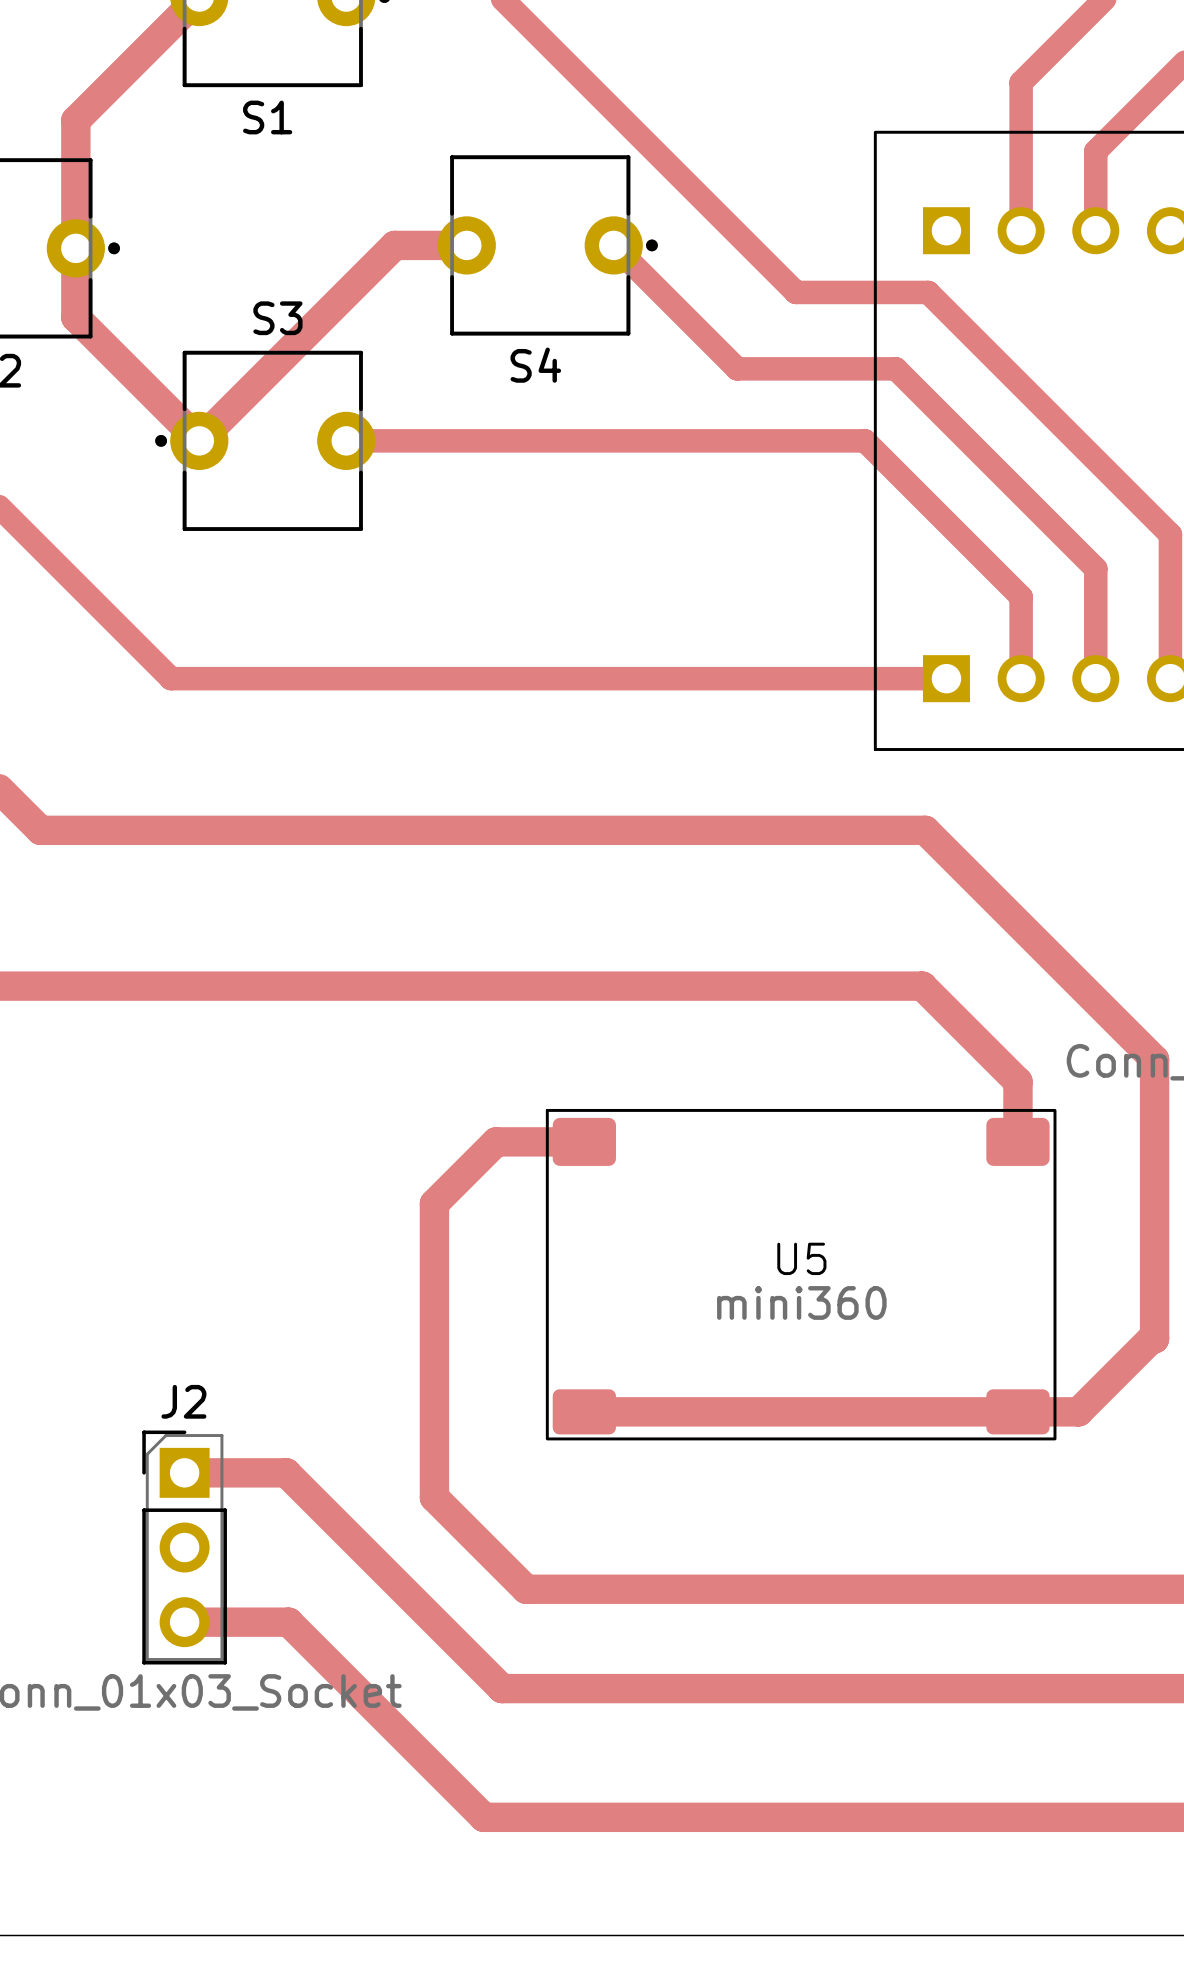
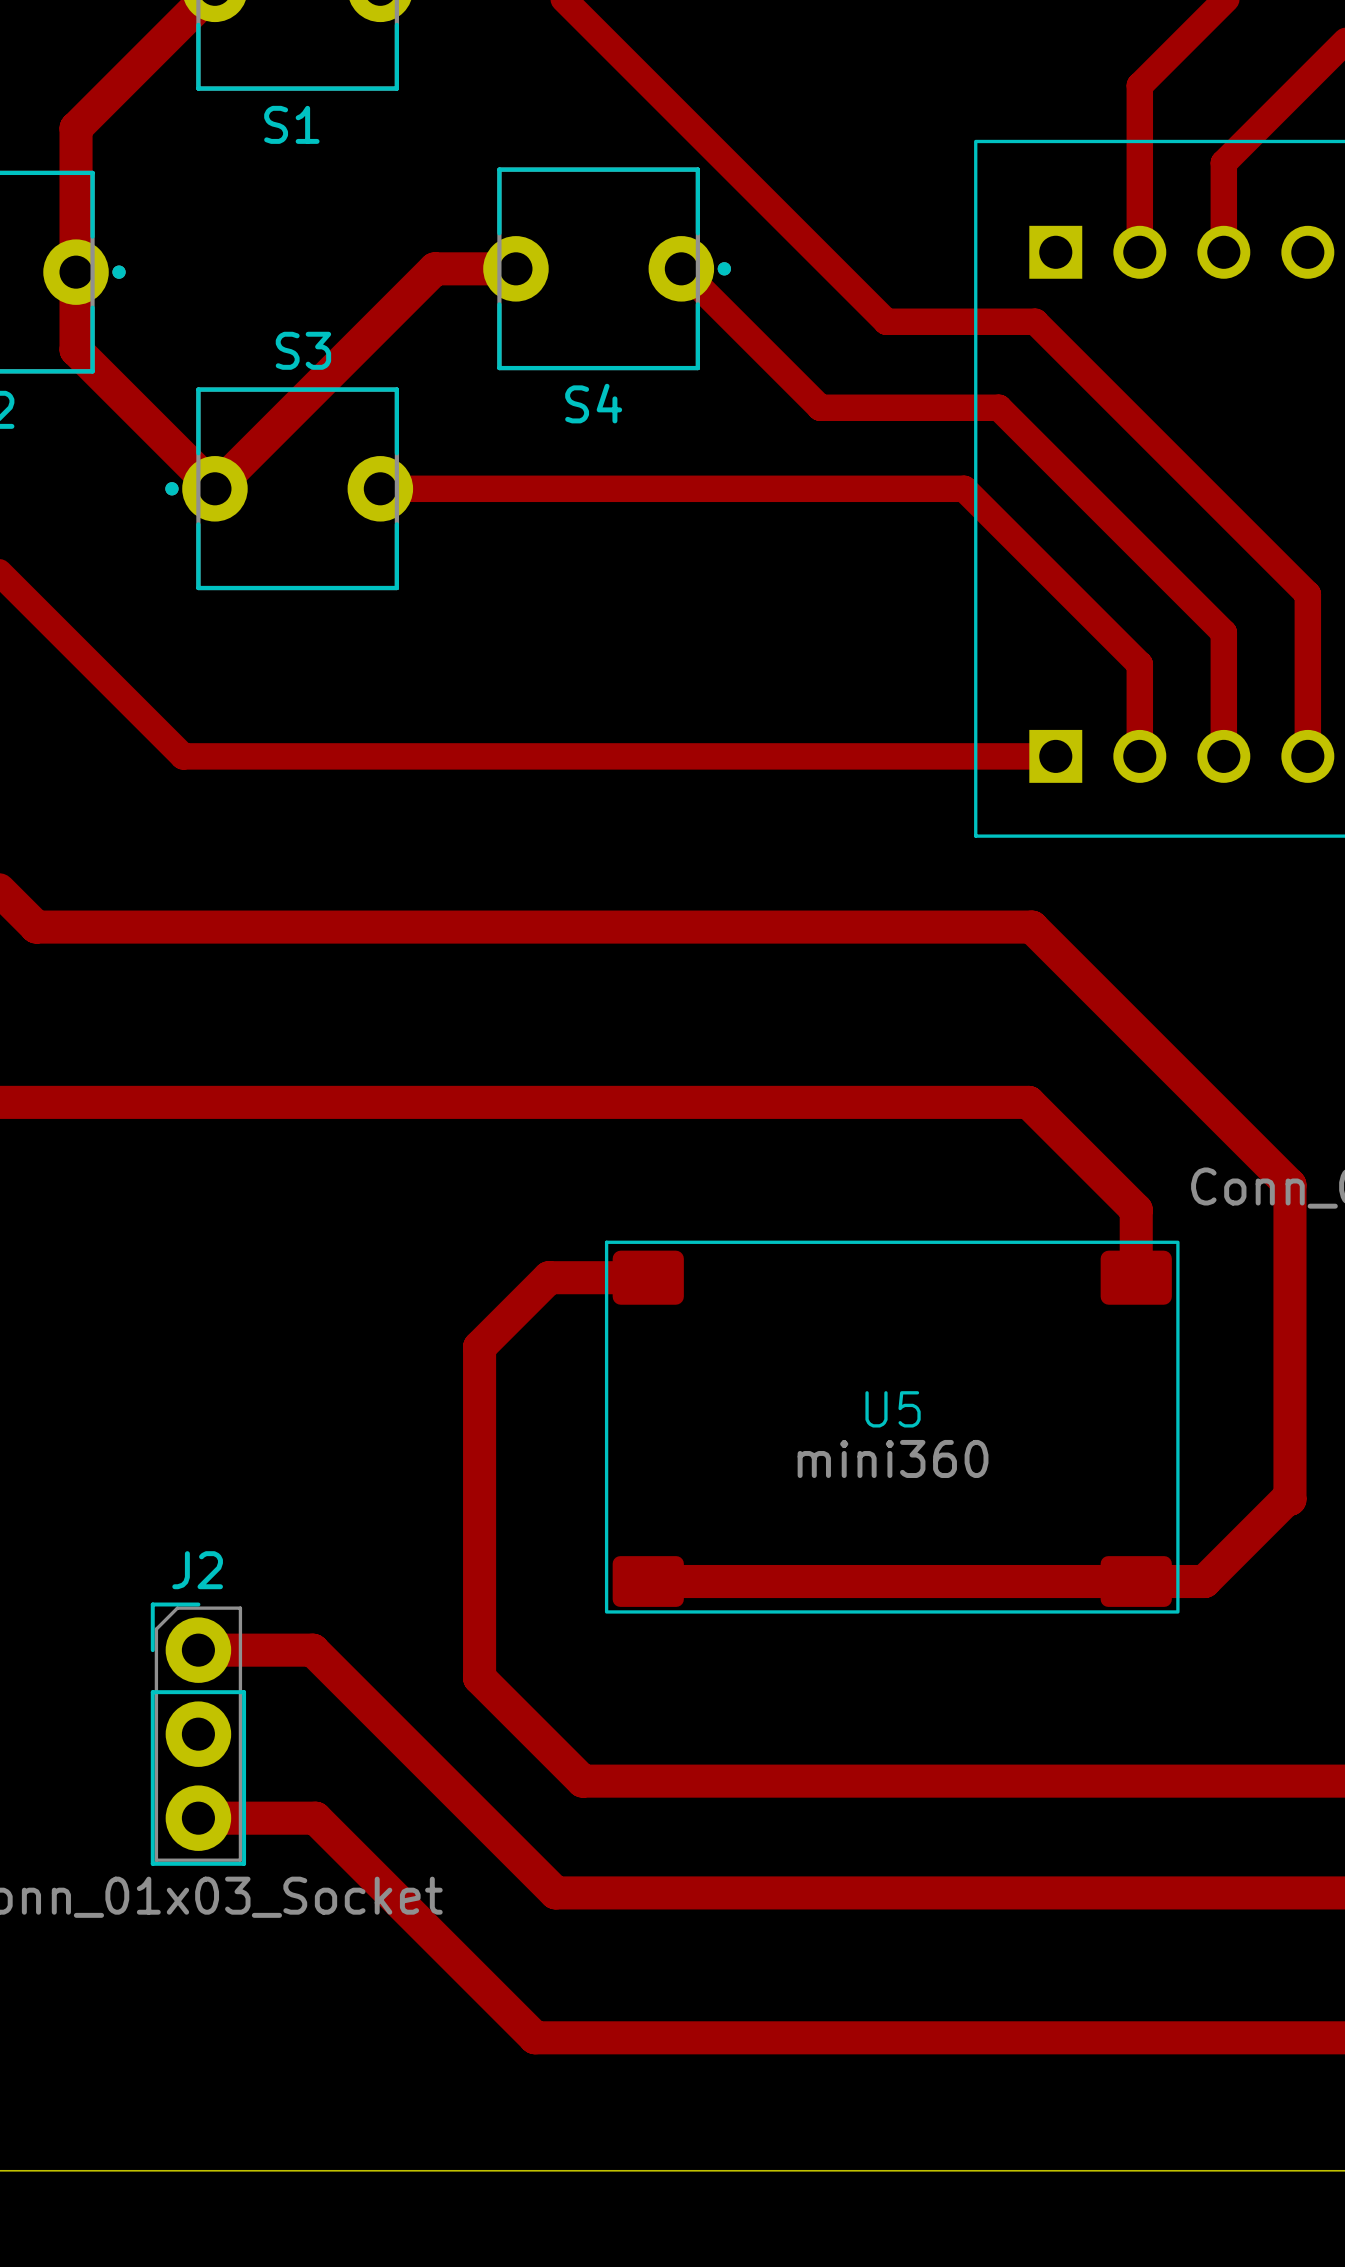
J2 footprint: [142, 1430, 227, 1665] -> [150, 1602, 247, 1866]

